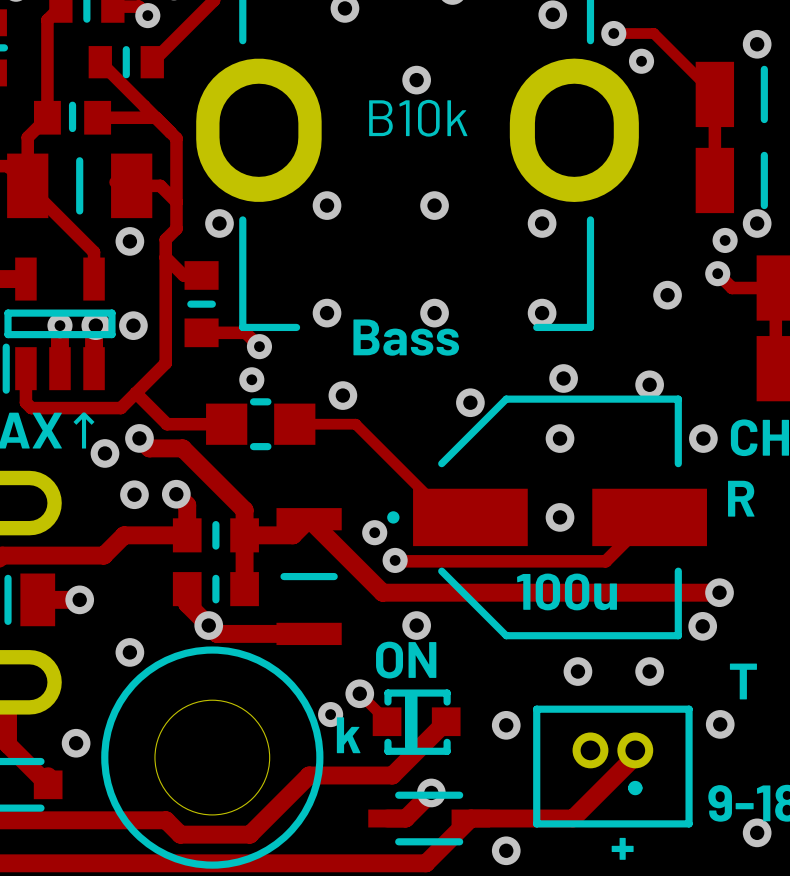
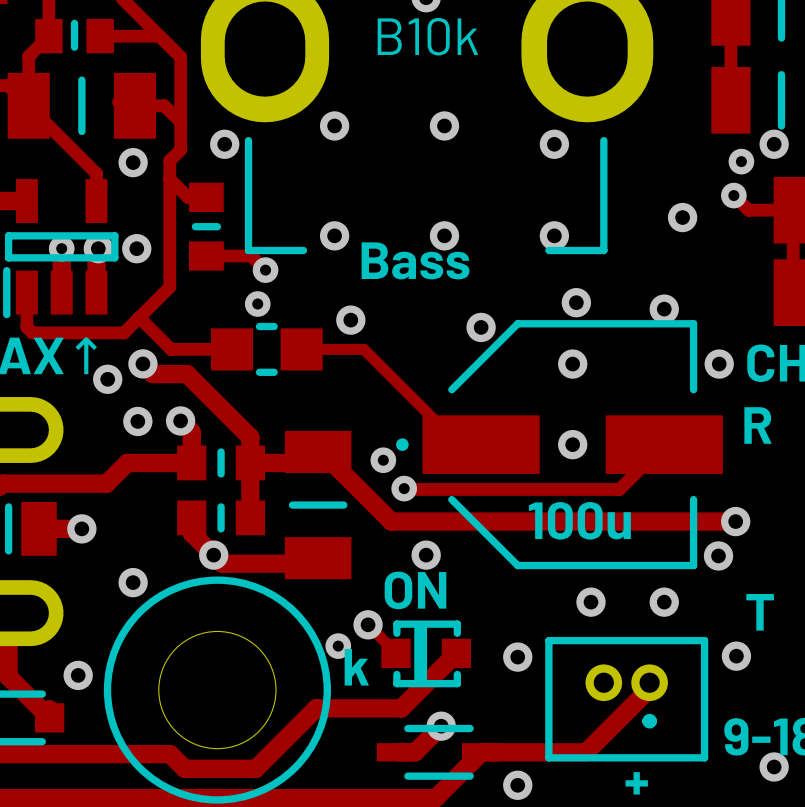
part footprint: [276, 508, 342, 646] -> [284, 430, 352, 580]

